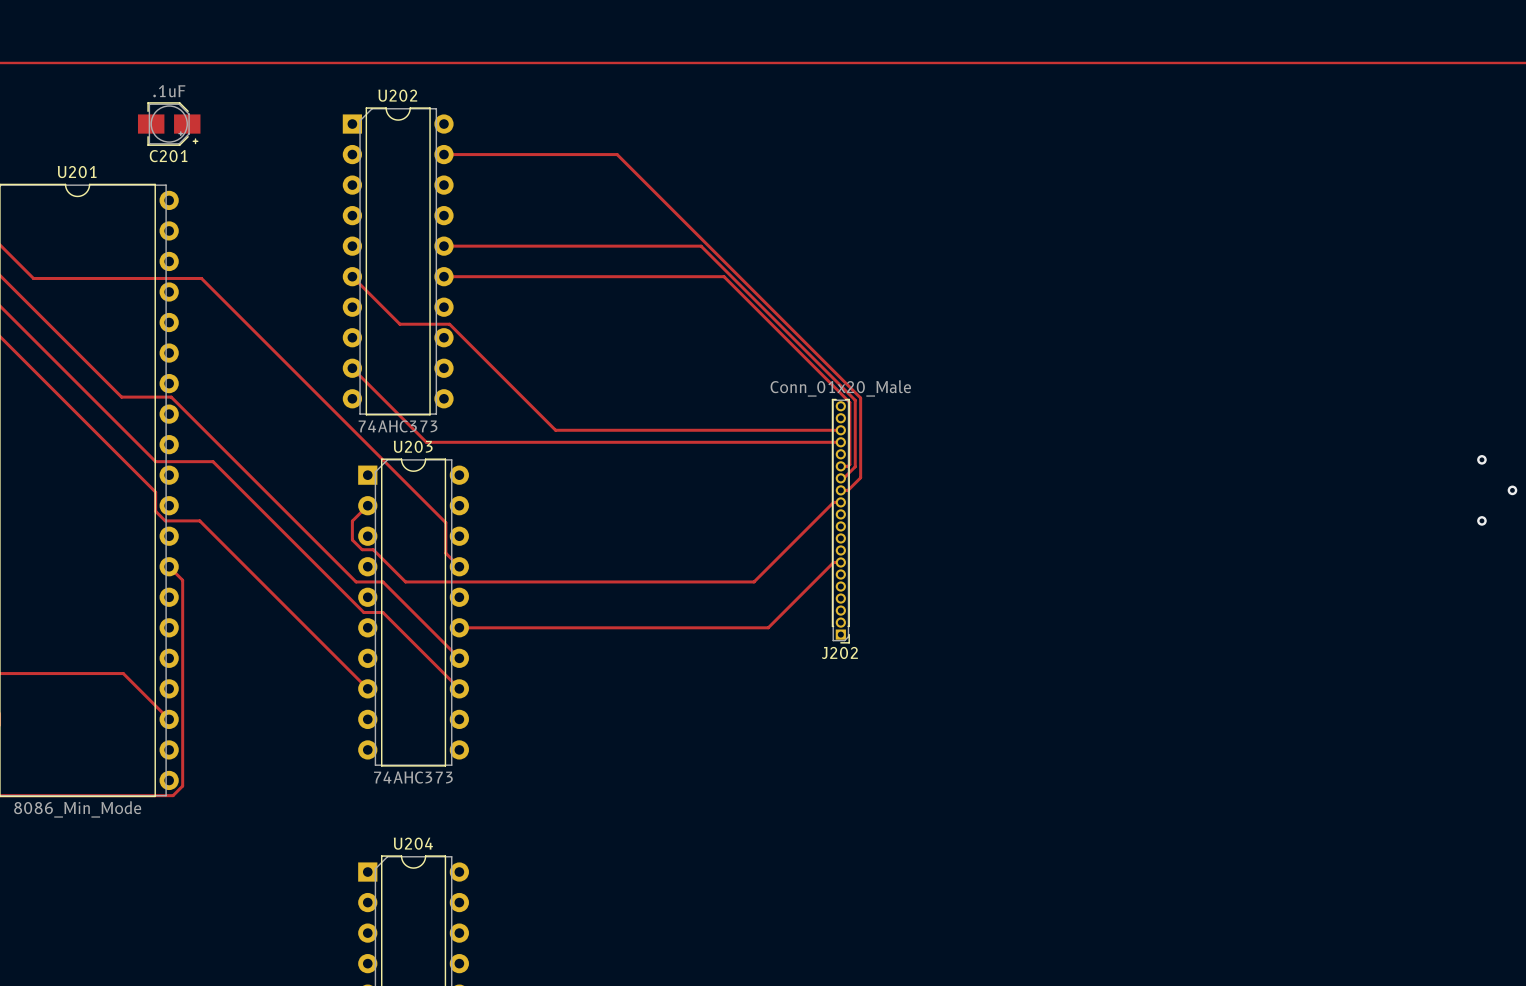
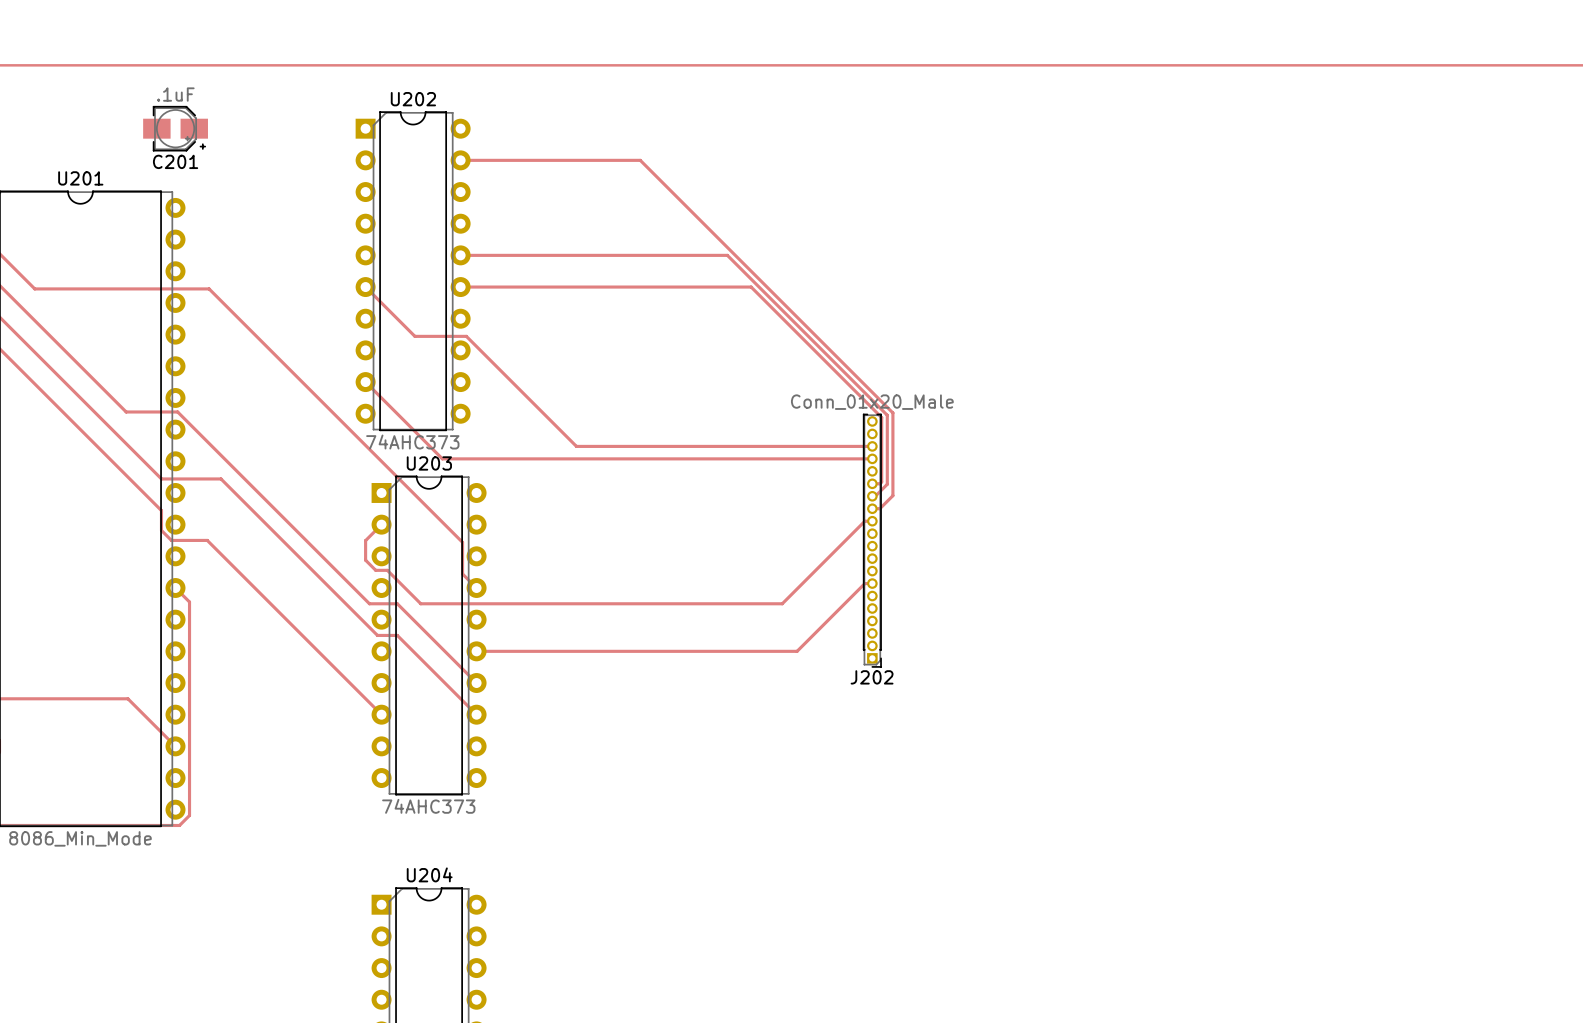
via: (1481, 459) -> none
via: (1512, 490) -> none
via: (1481, 520) -> none

